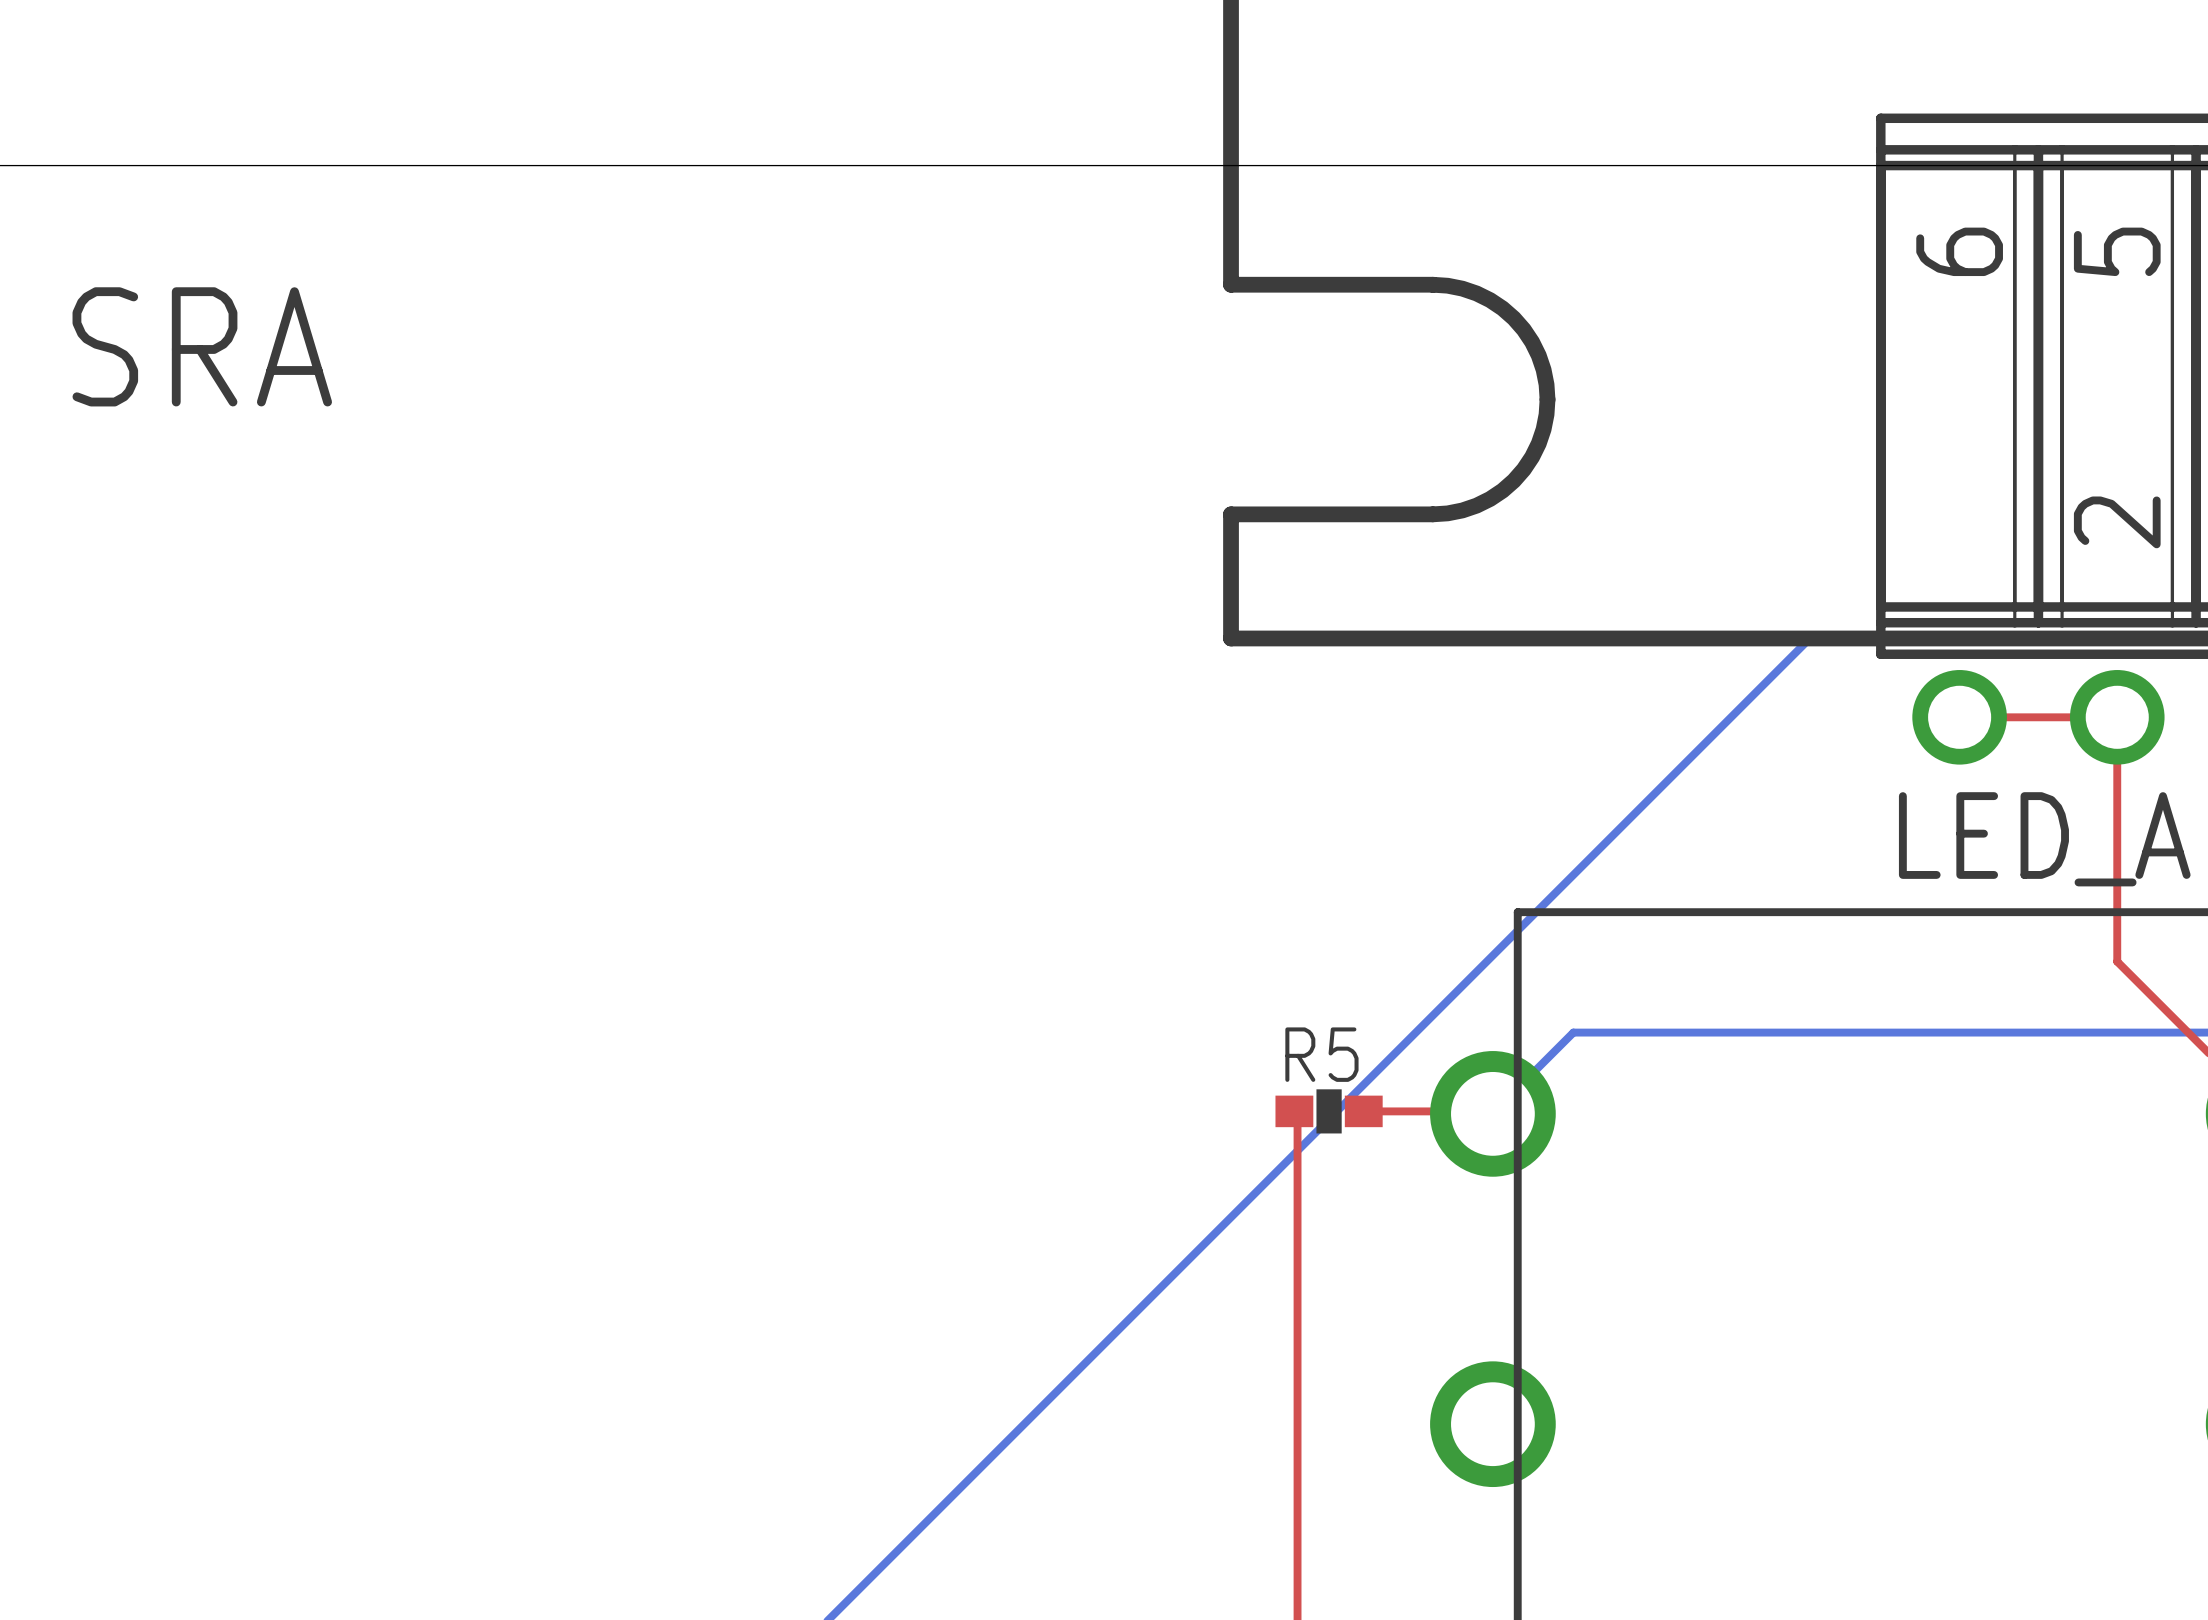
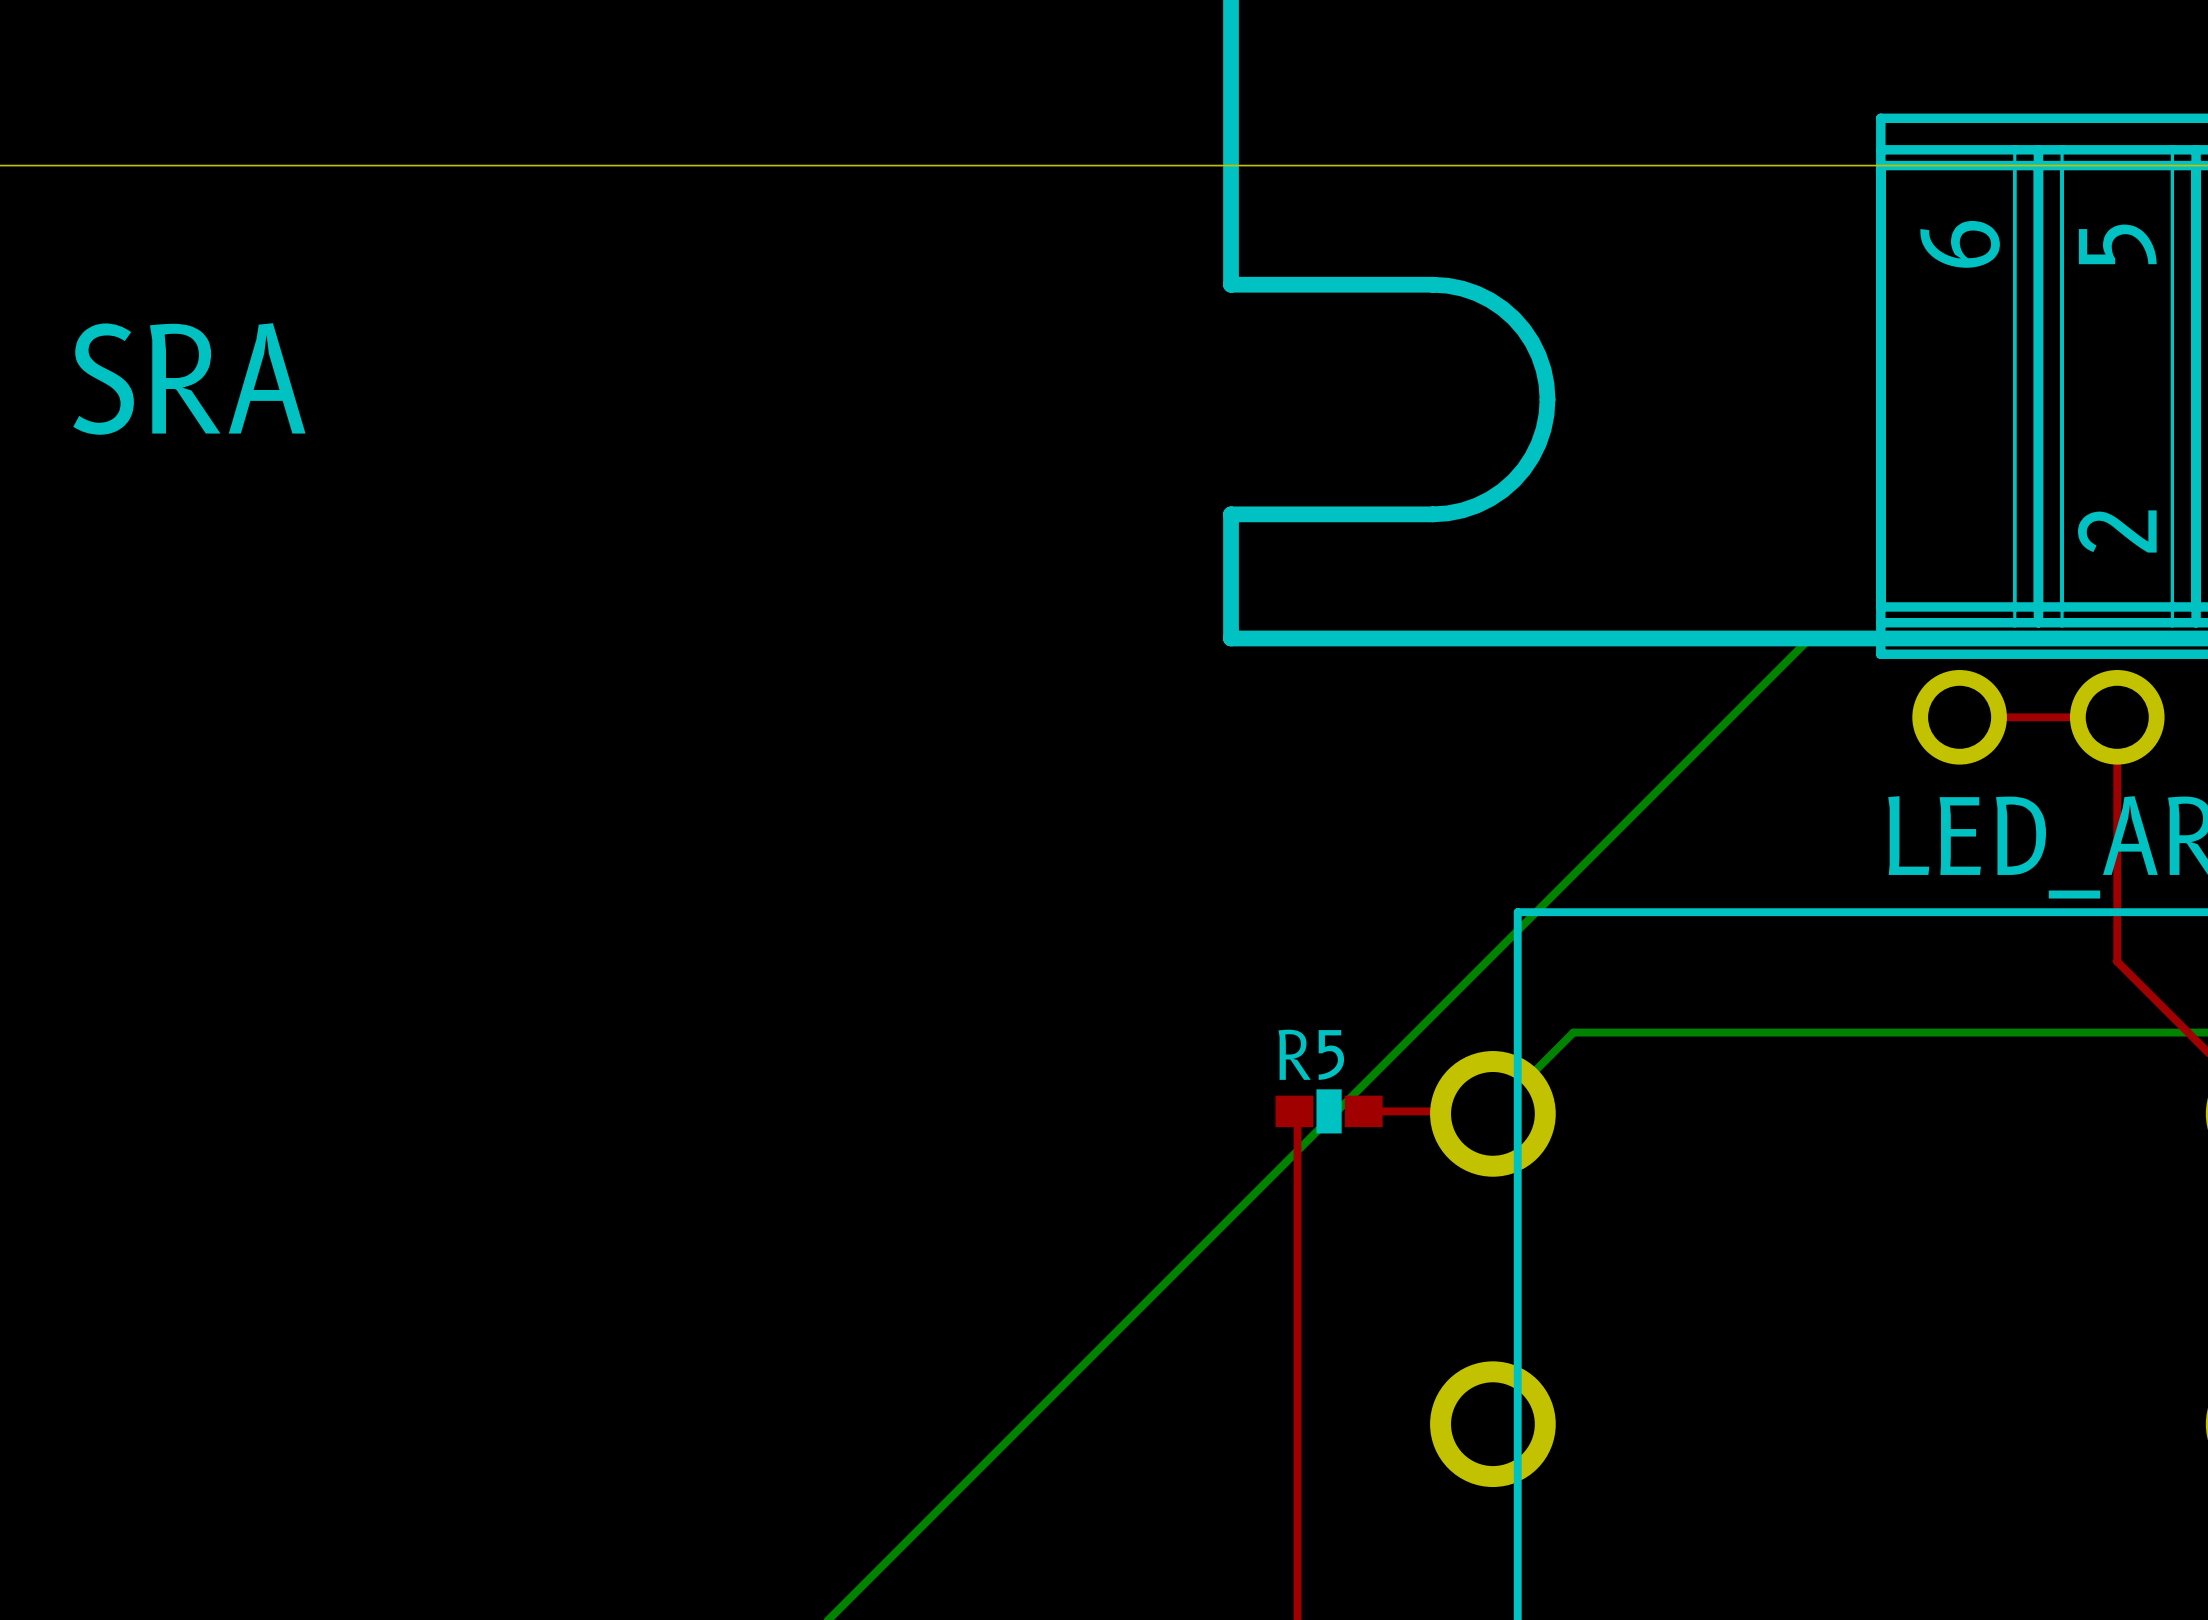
text position: SRA (202, 346) -> SRA (189, 378)

